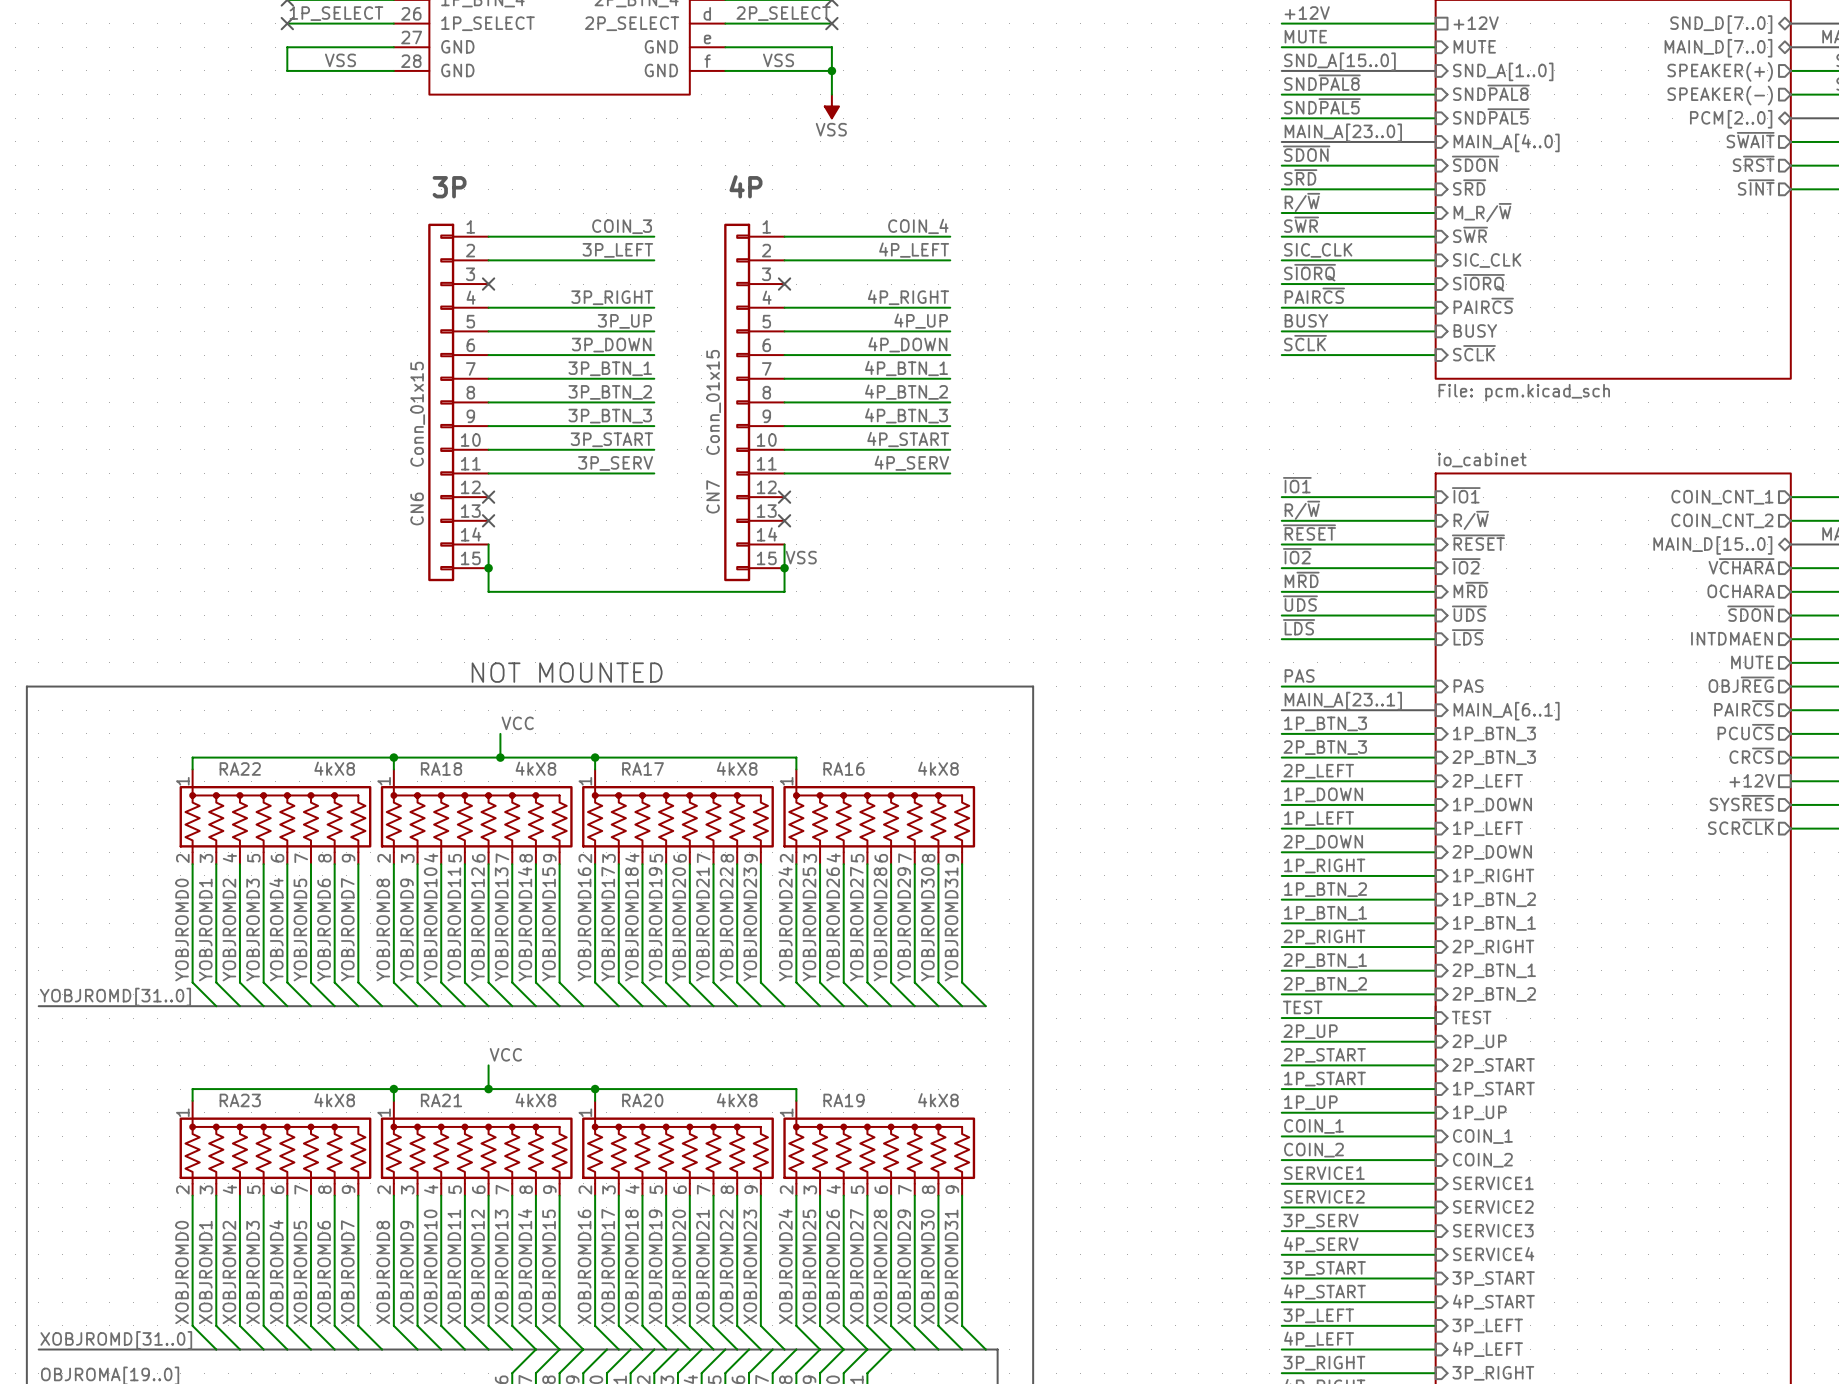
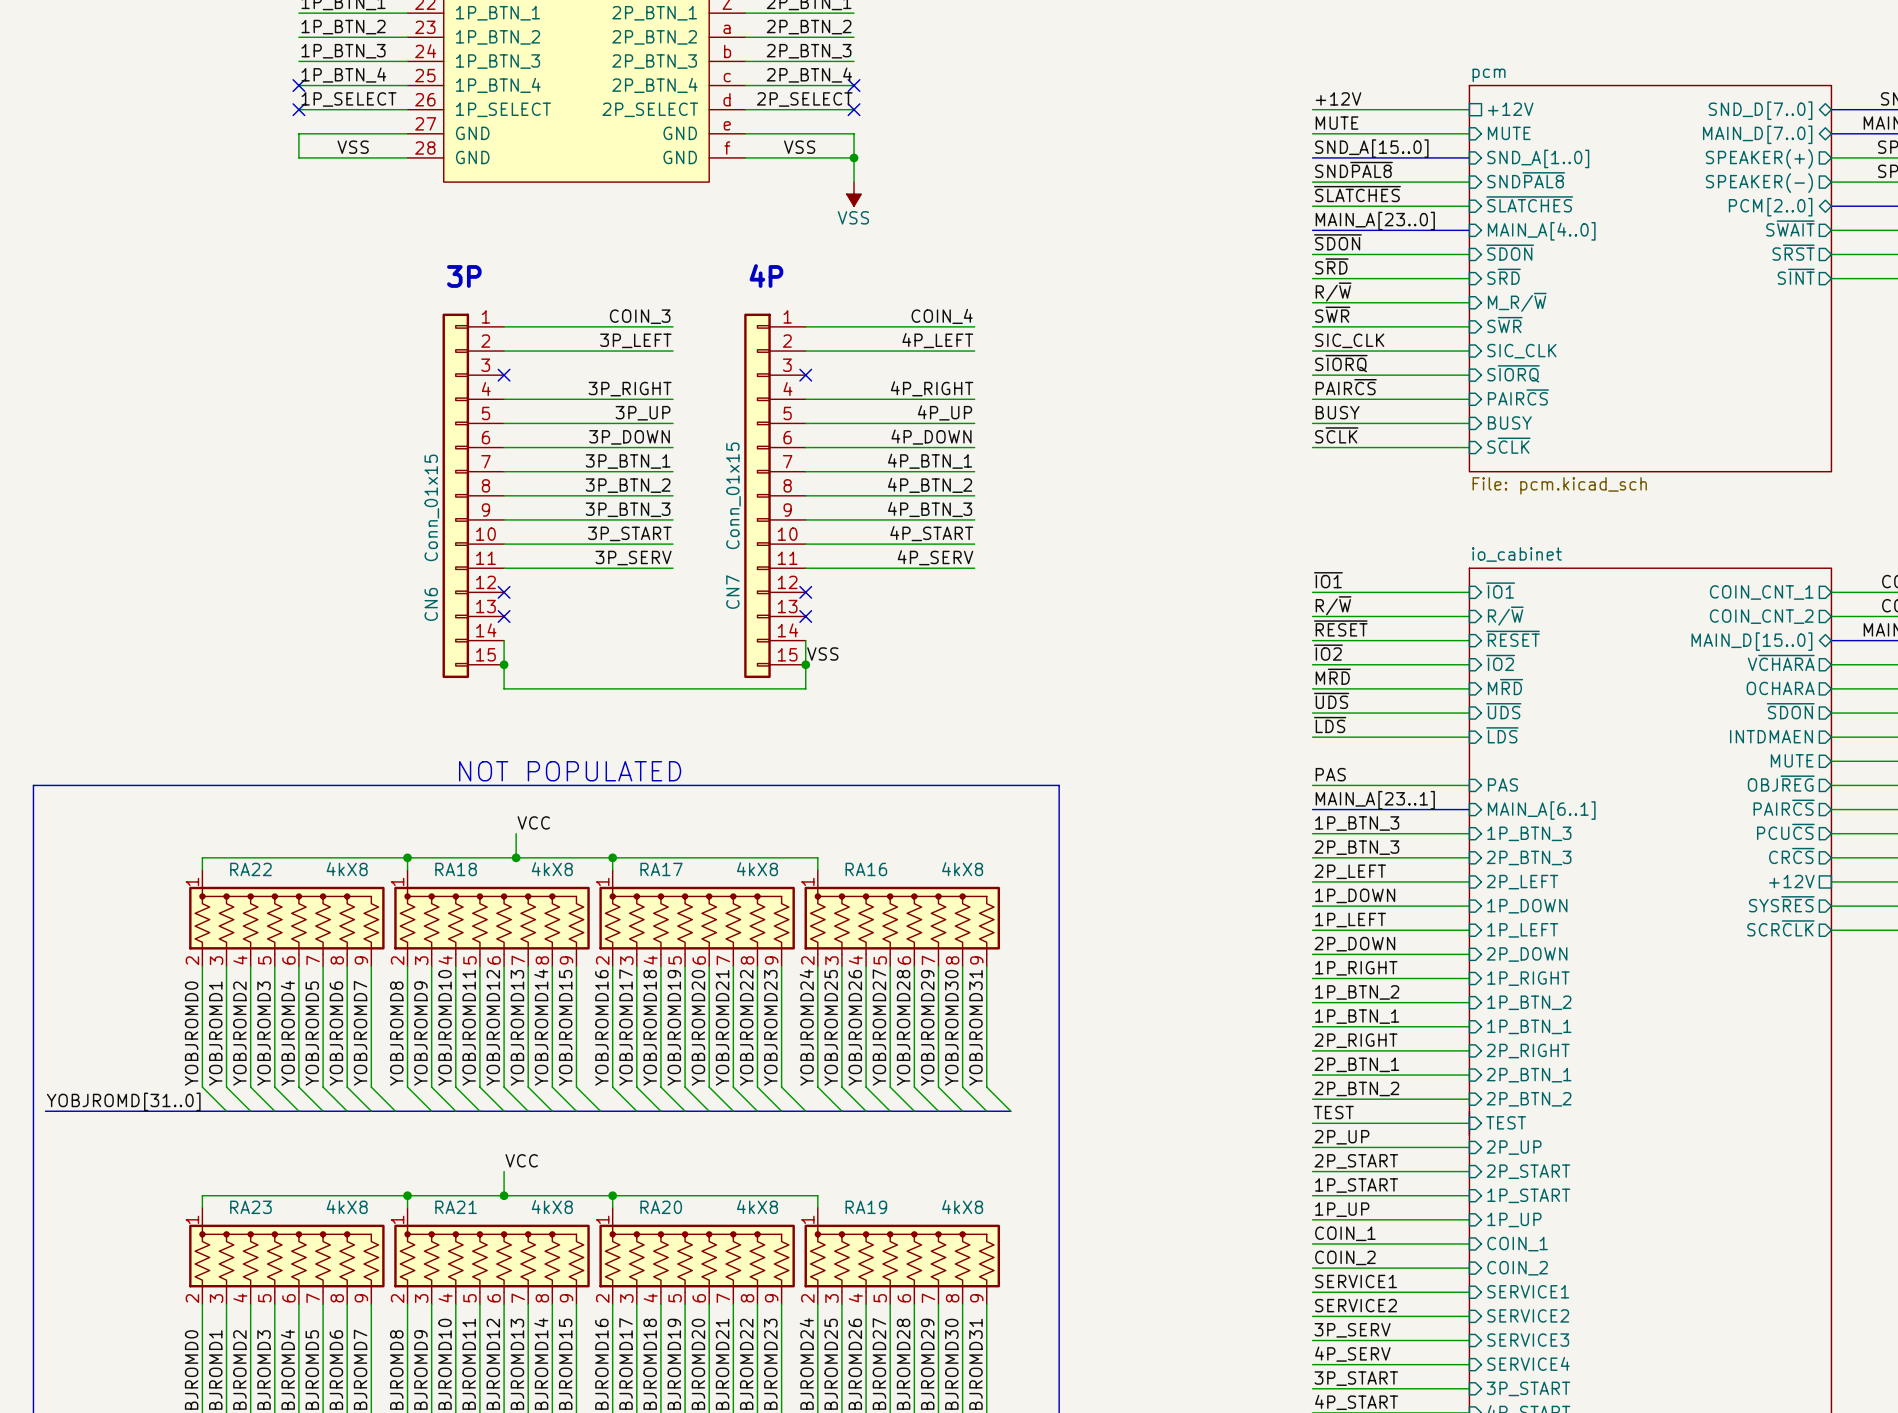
label: SND~{PAL5} (1322, 106) -> ~{SLATCHES} (1357, 194)
sheet pin: SND~{PAL5} (1491, 116) -> ~{SLATCHES} (1529, 204)
text: NOT MOUNTED (567, 672) -> NOT POPULATED (570, 771)

